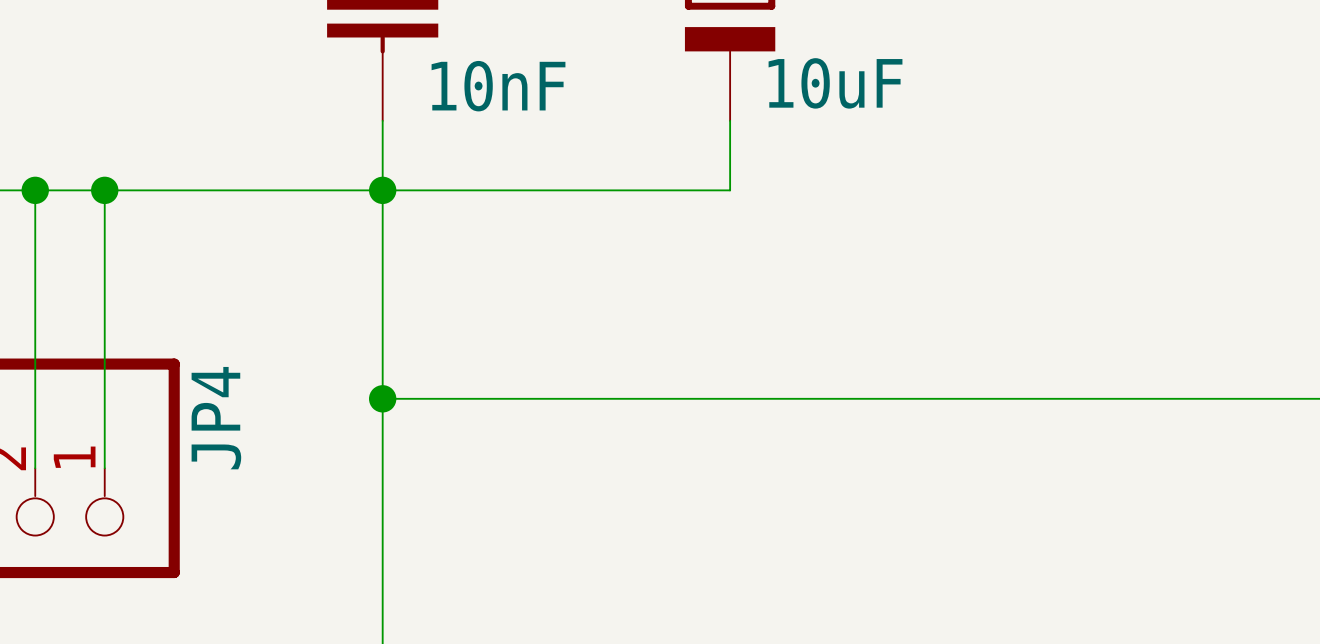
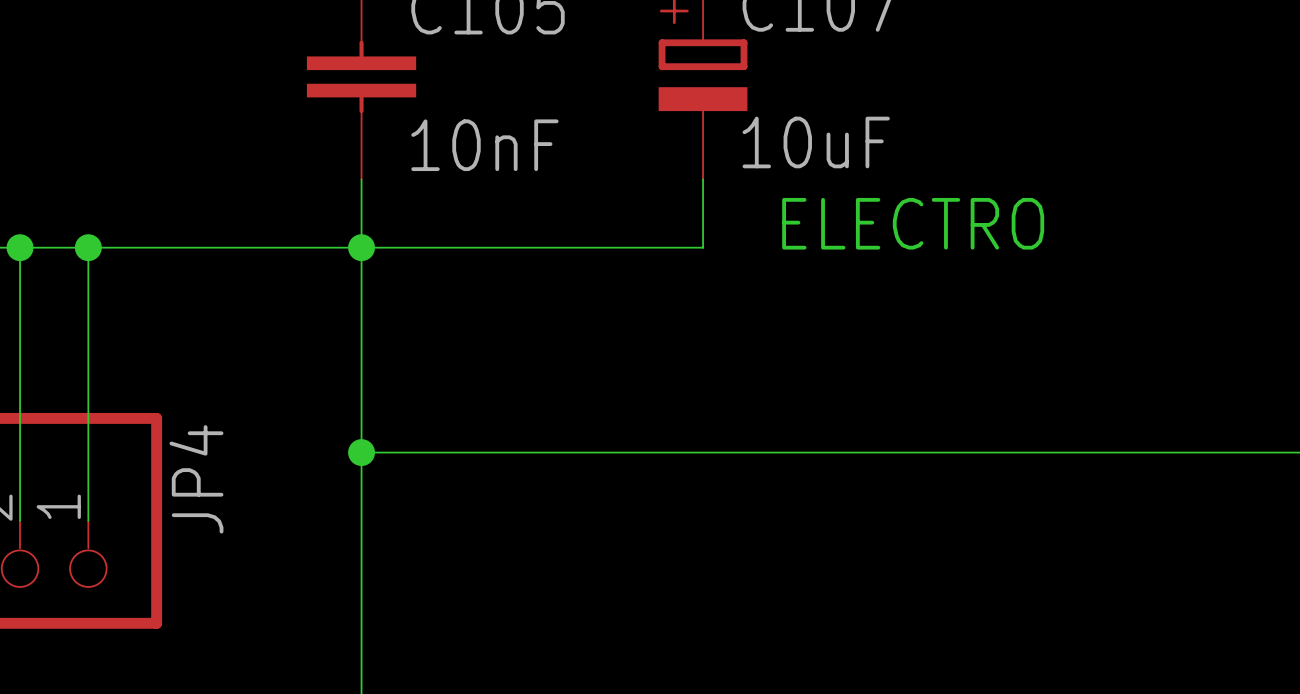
text: none -> ELECTRO (913, 223)

